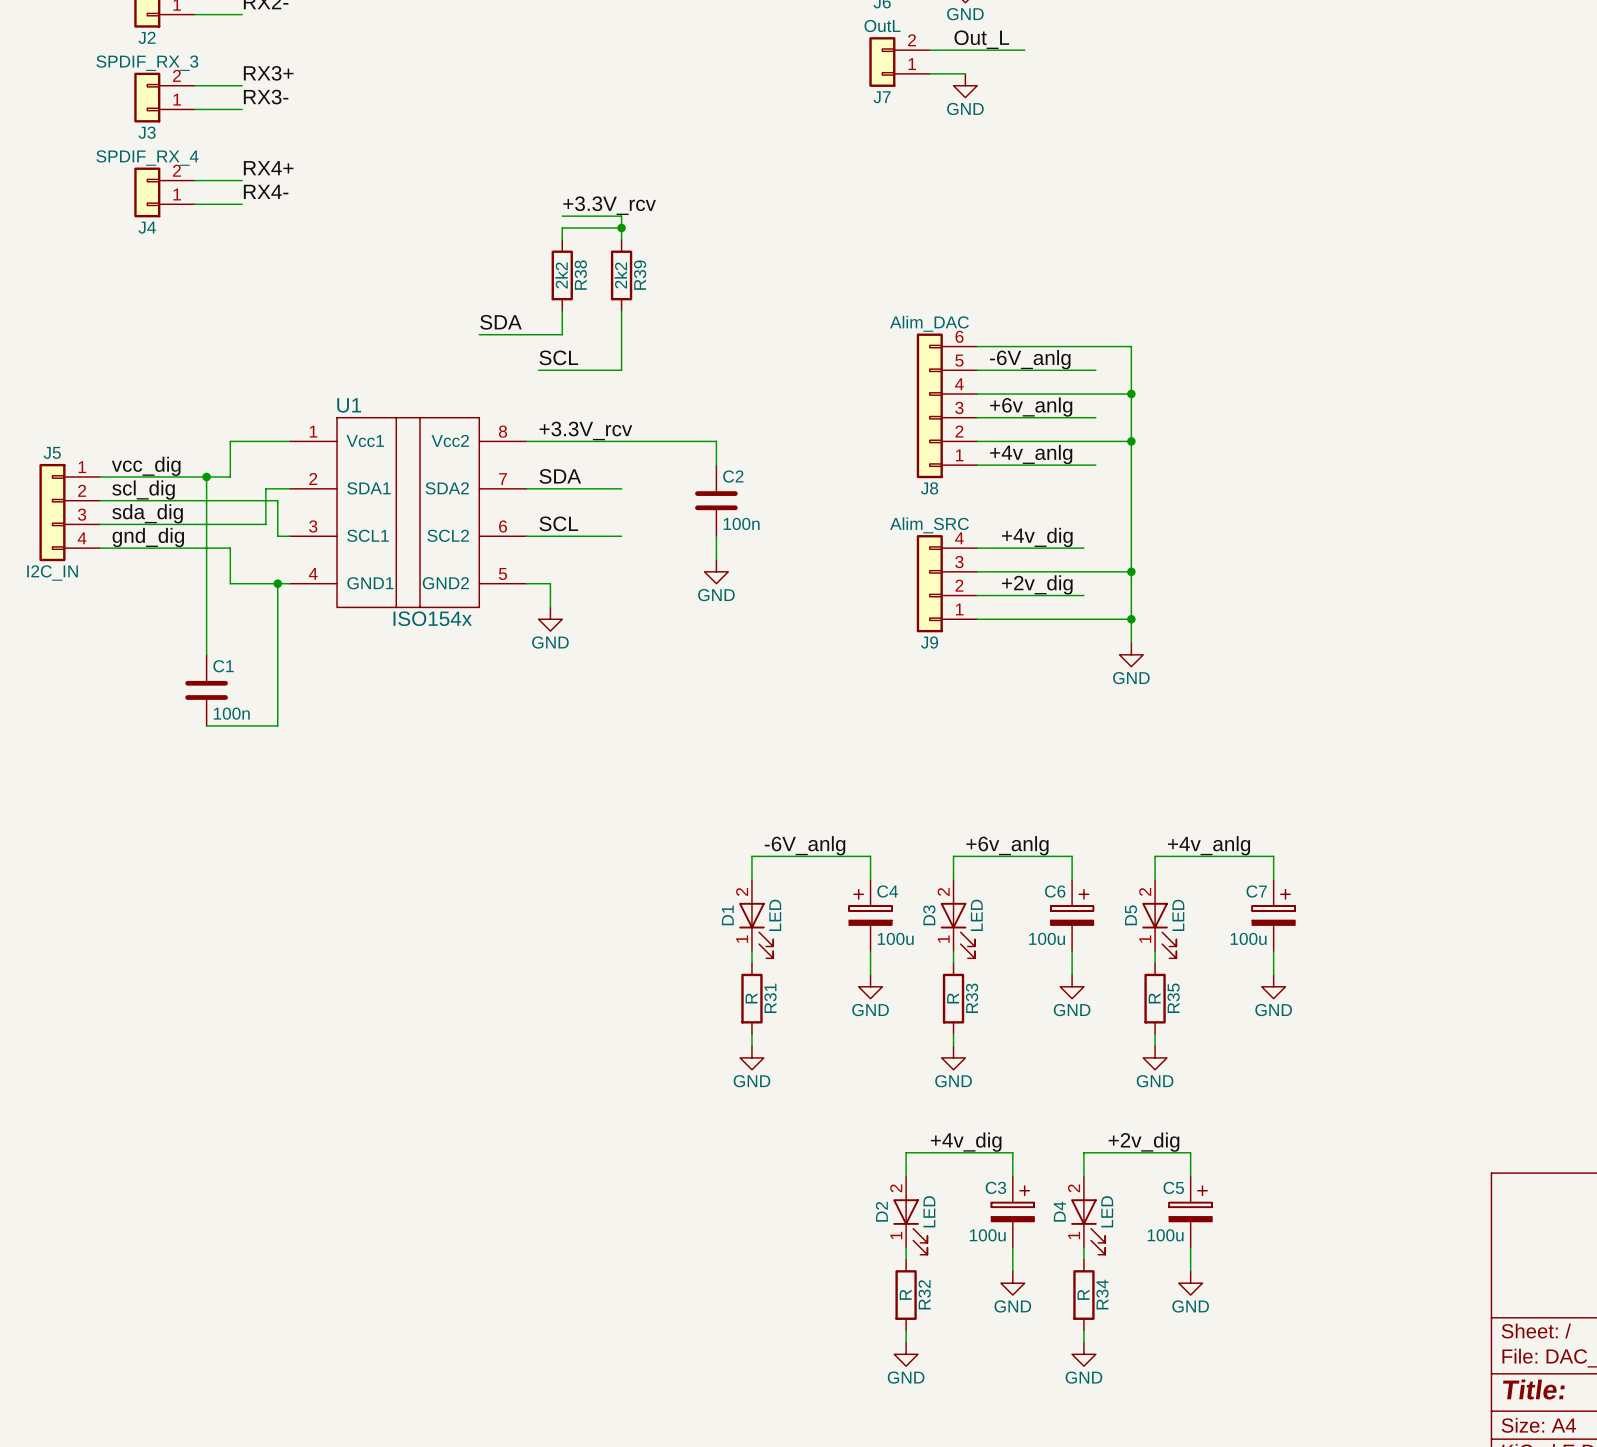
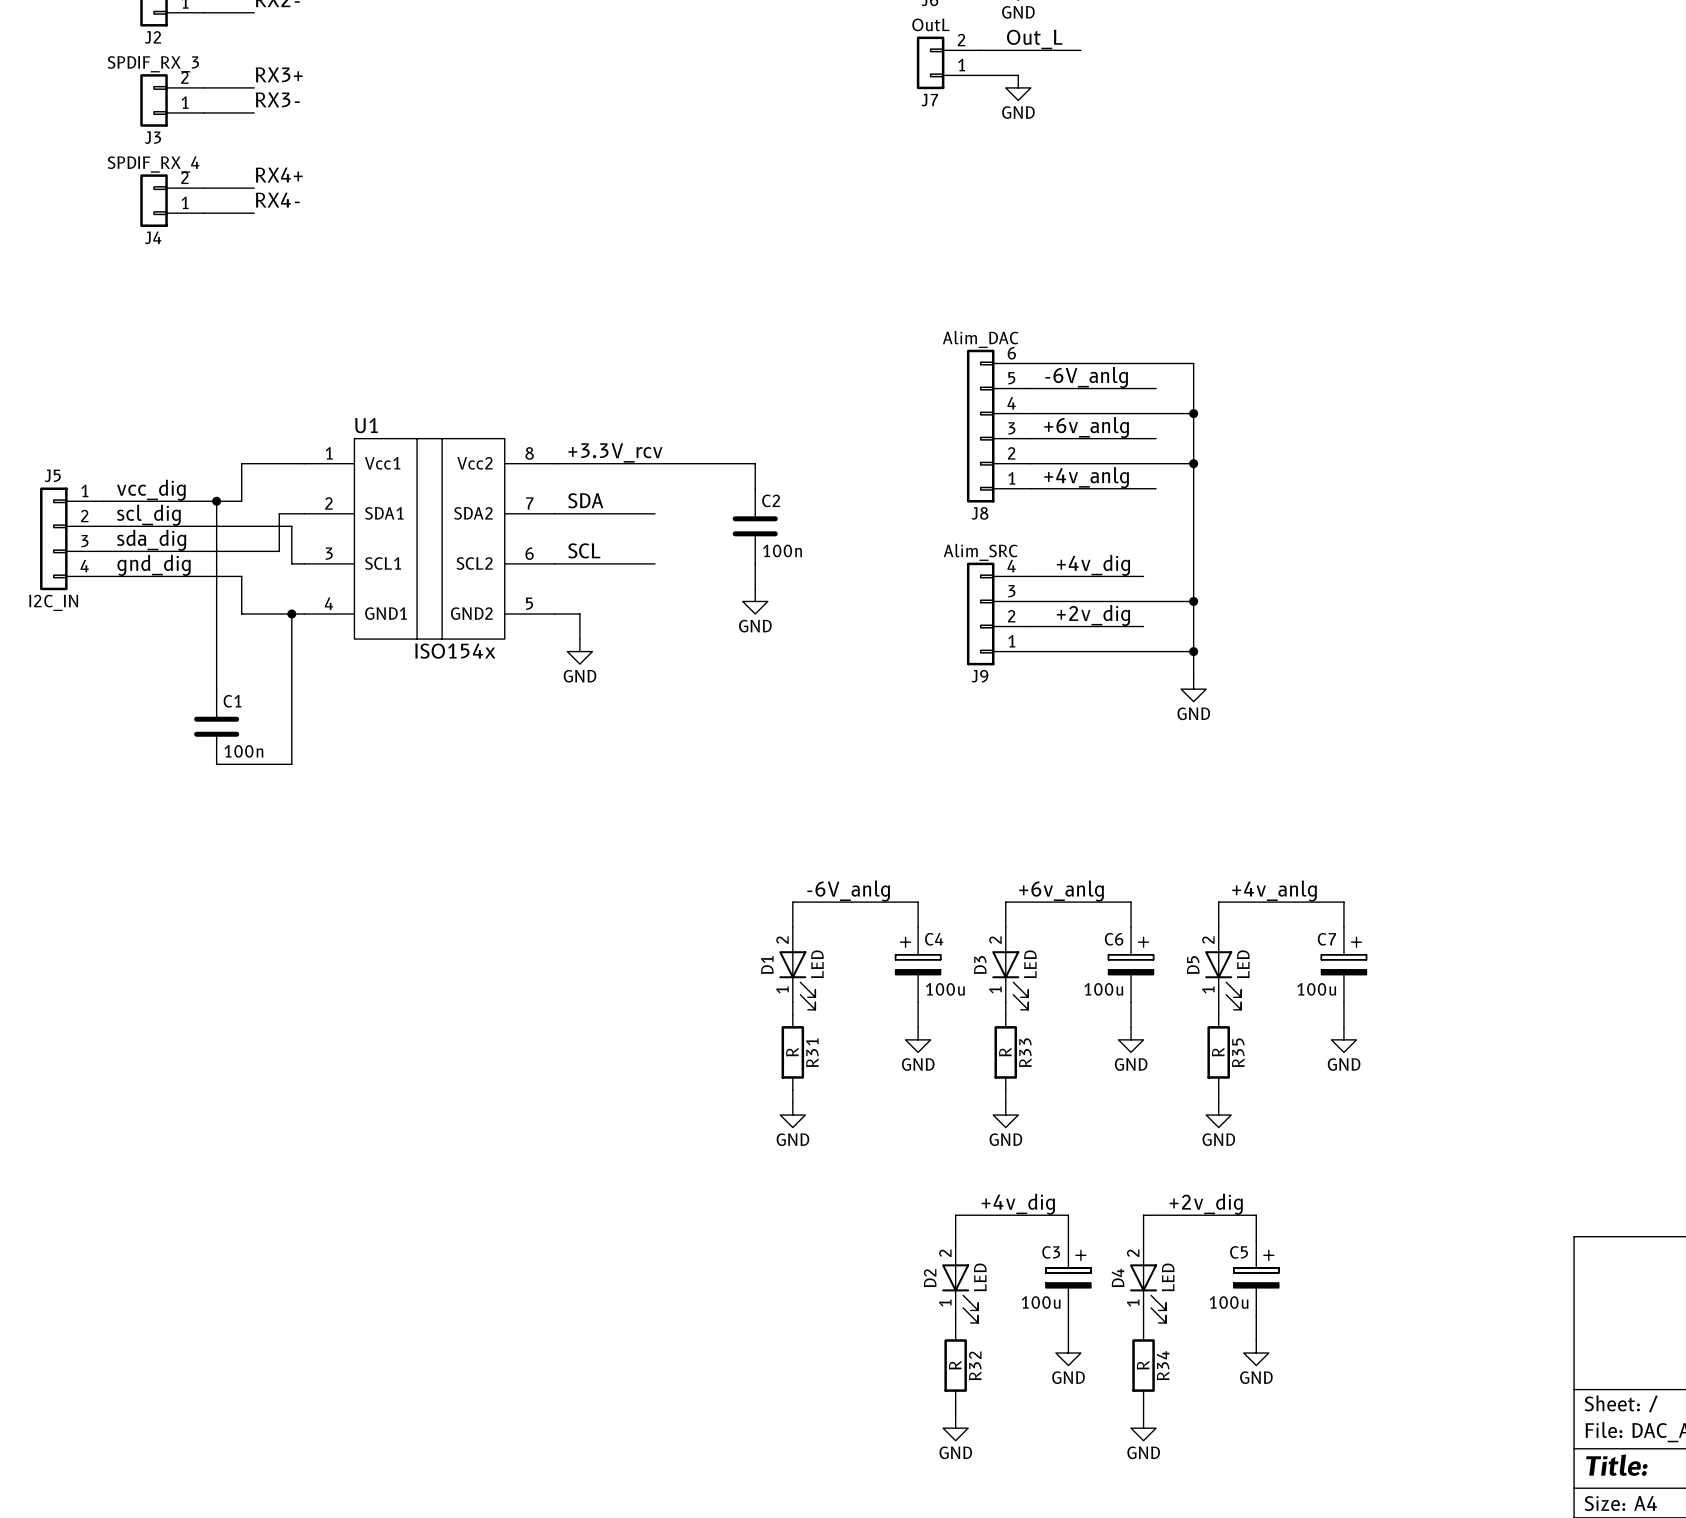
label: +3.3V_rcv (609, 205) -> none
wire: (562, 216) (621, 216) (621, 239) -> none
wire: (621, 228) (562, 228) (562, 239) -> none
junction: (621, 228) -> none
R38: 2k2 (562, 275) -> none
R39: 2k2 (621, 275) -> none
wire: (562, 311) (562, 334) (479, 334) -> none
wire: (621, 311) (621, 370) (538, 370) -> none
label: SDA (500, 322) -> none
label: SCL (558, 357) -> none

